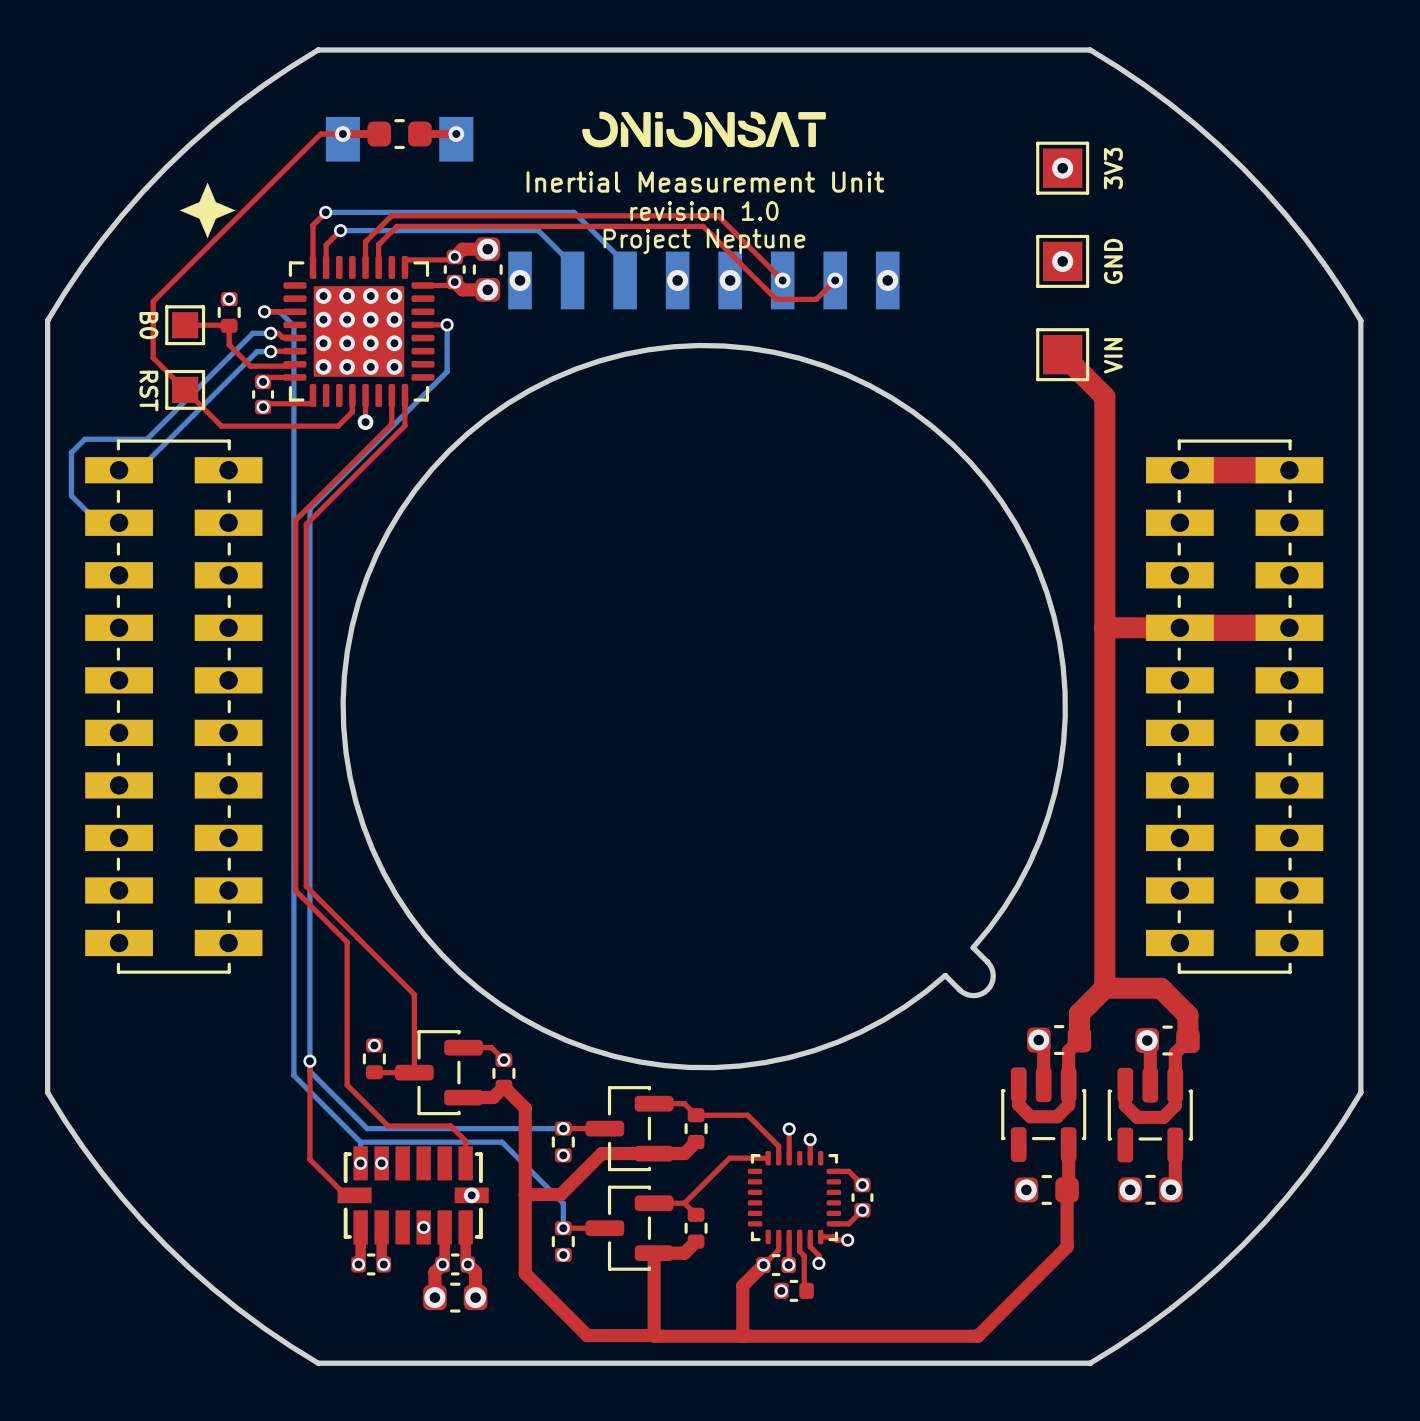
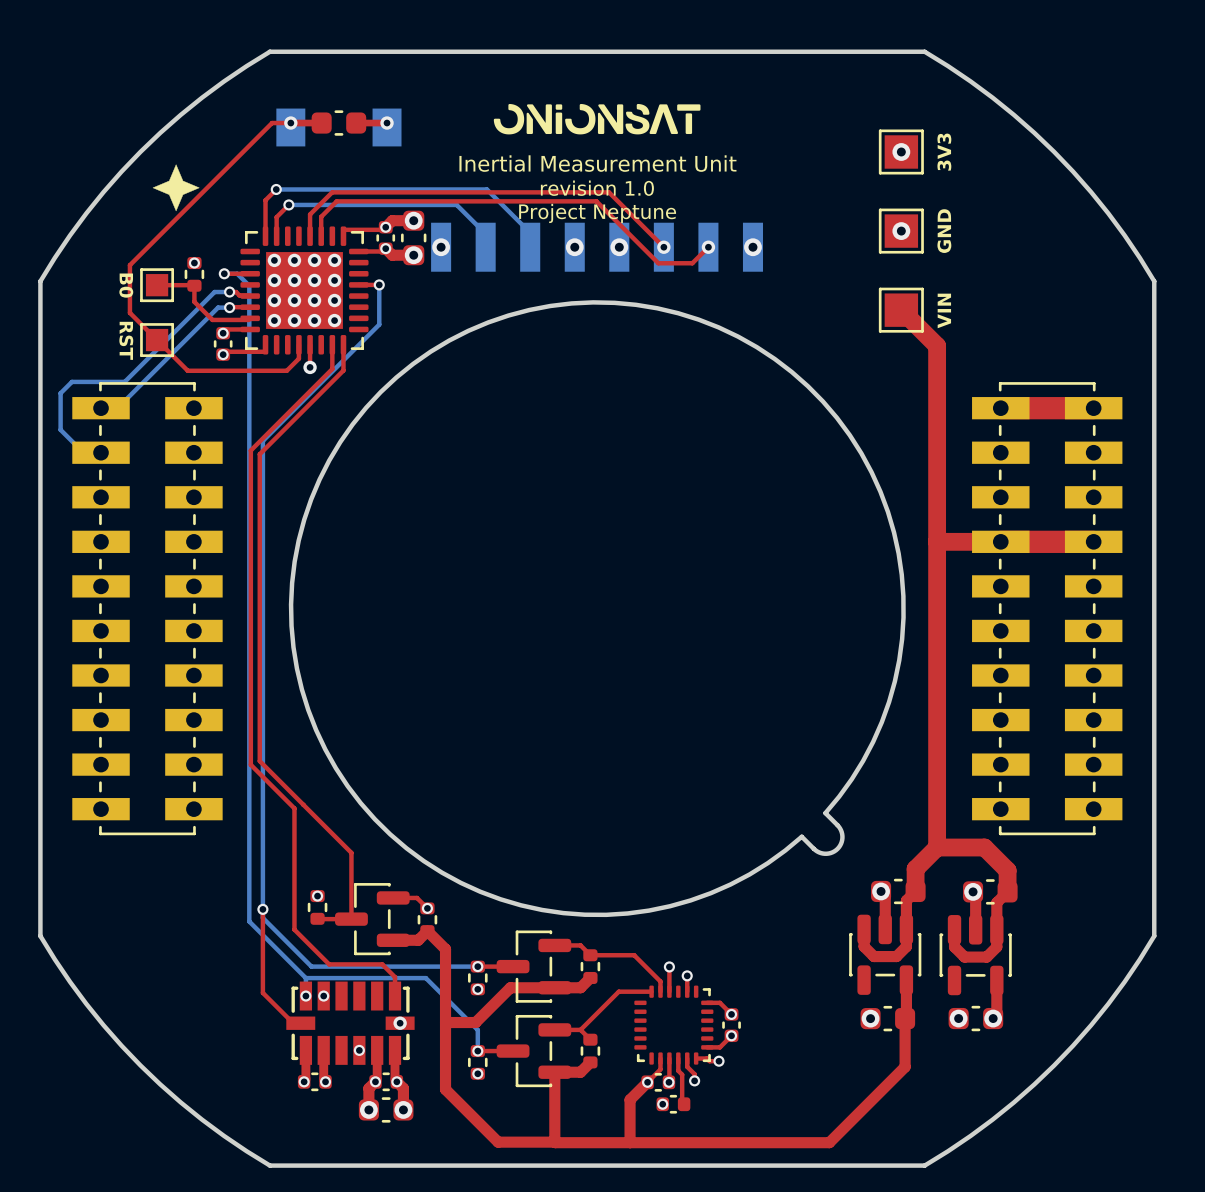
part footprint: [747, 1150, 842, 1245] -> [634, 985, 714, 1065]

